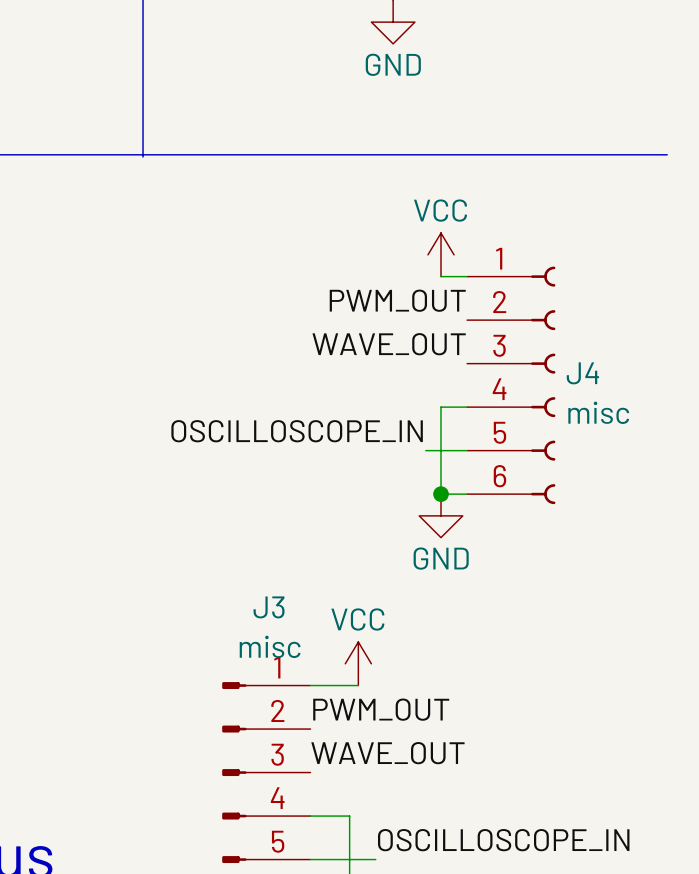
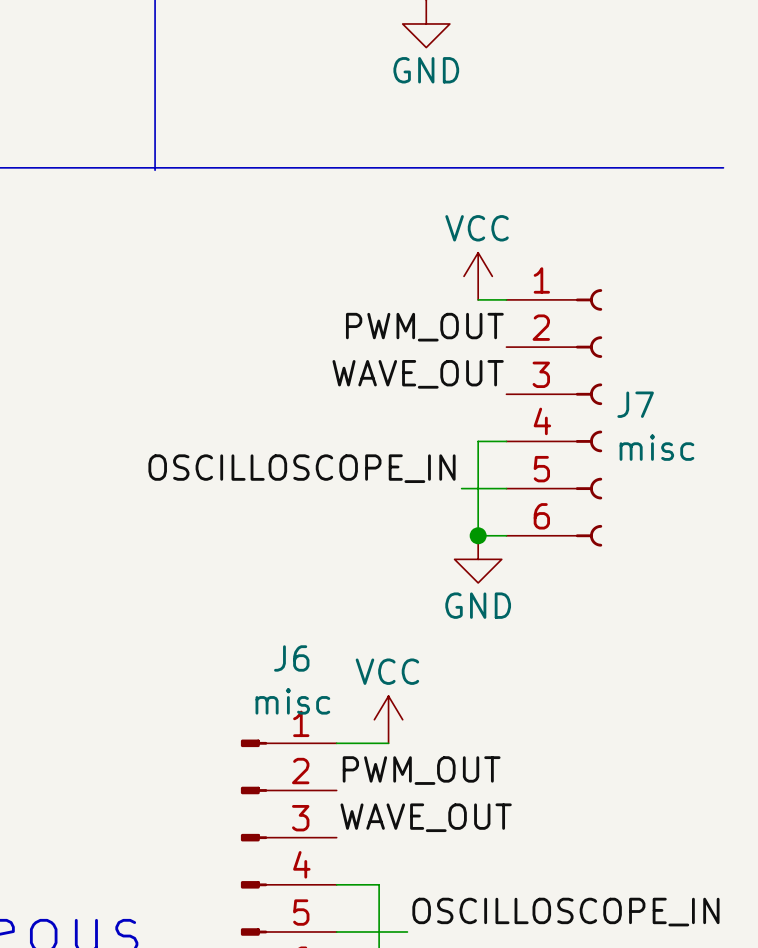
J4 name: J4 (582, 373) -> J7 (635, 404)
J3 name: J3 (269, 607) -> J6 (291, 658)

